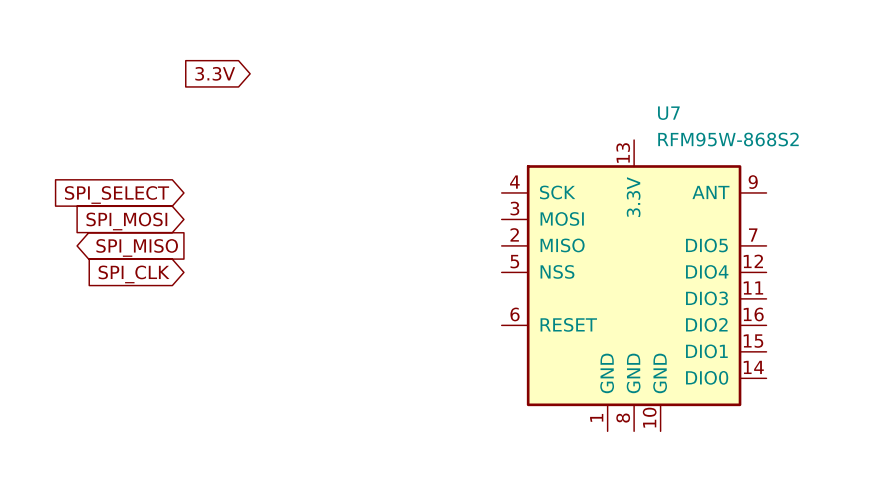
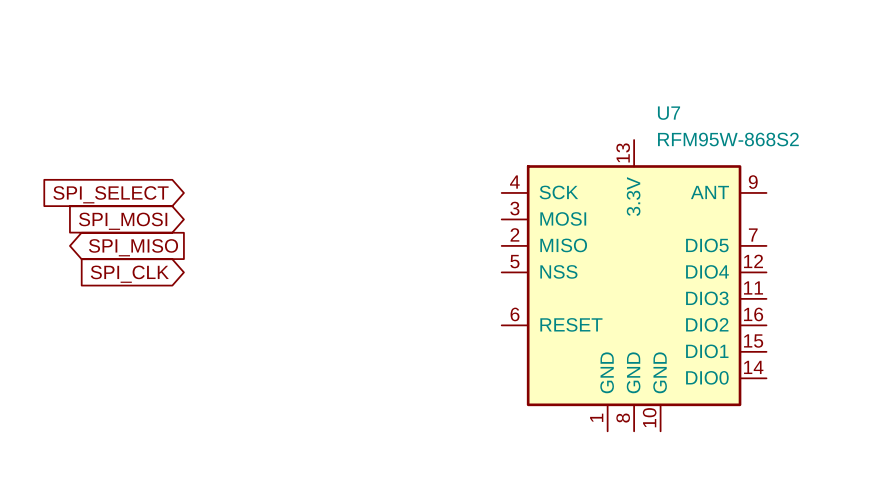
global label: 3.3V (215, 73) -> none

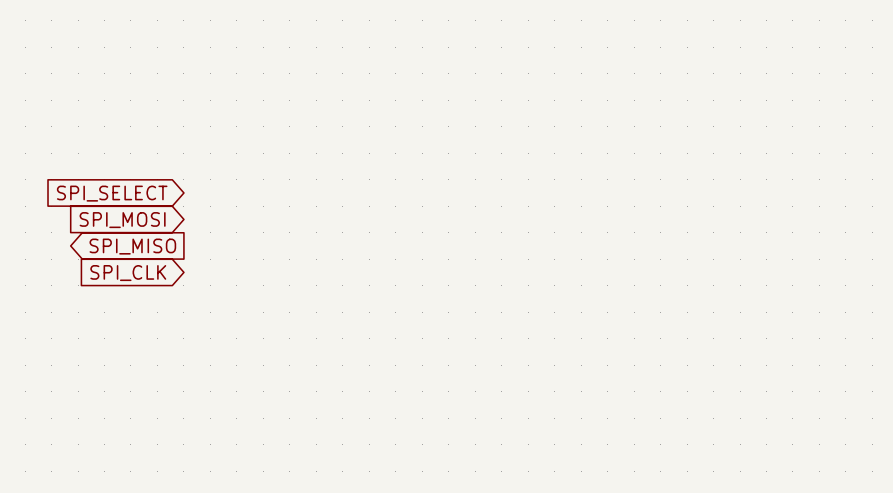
U7: RFM95W-868S2 (634, 285) -> none

